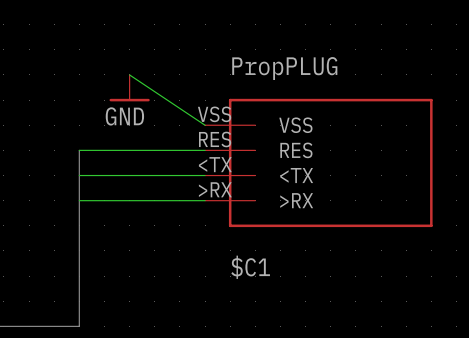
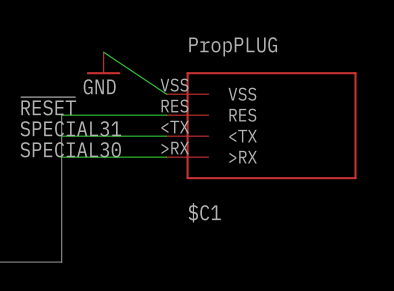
label: none -> ~{RESET} (48, 106)
label: none -> SPECIAL31 (70, 128)
label: none -> SPECIAL30 (70, 149)

